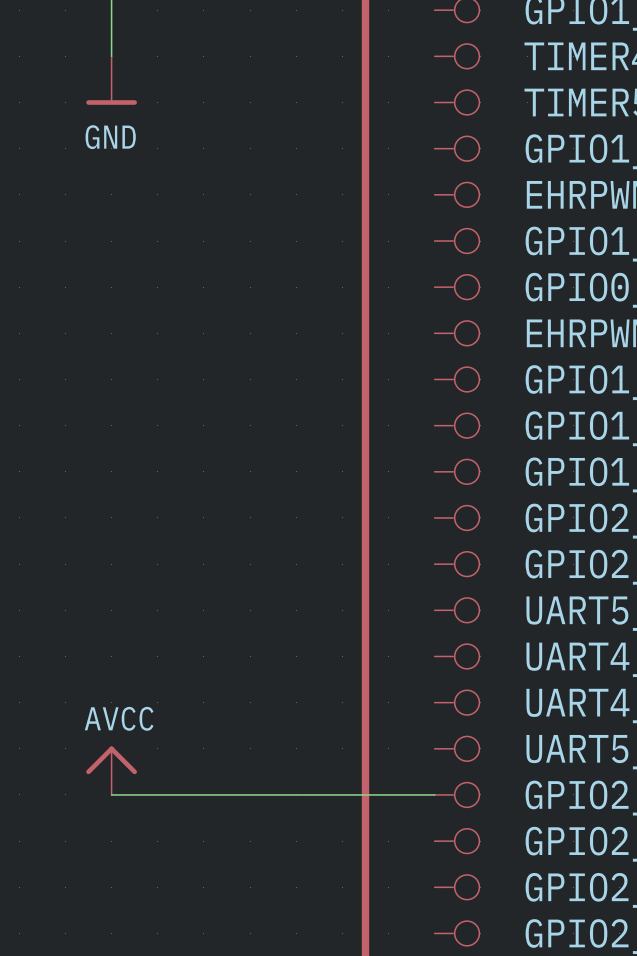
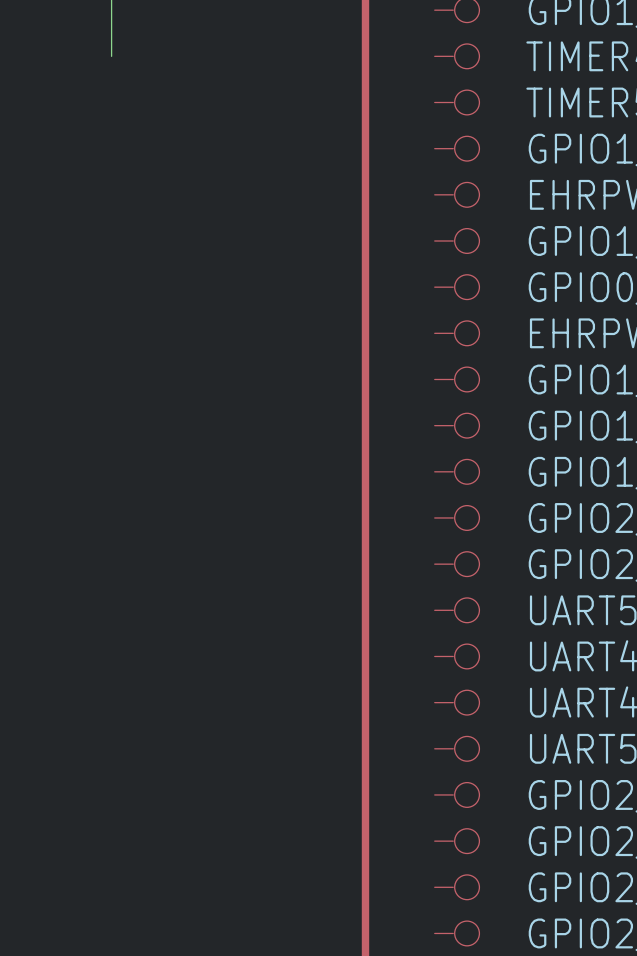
power symbol: GND (111, 80) -> none
power symbol: AVCC (111, 770) -> none
wire: (111, 794) (434, 794) -> none

